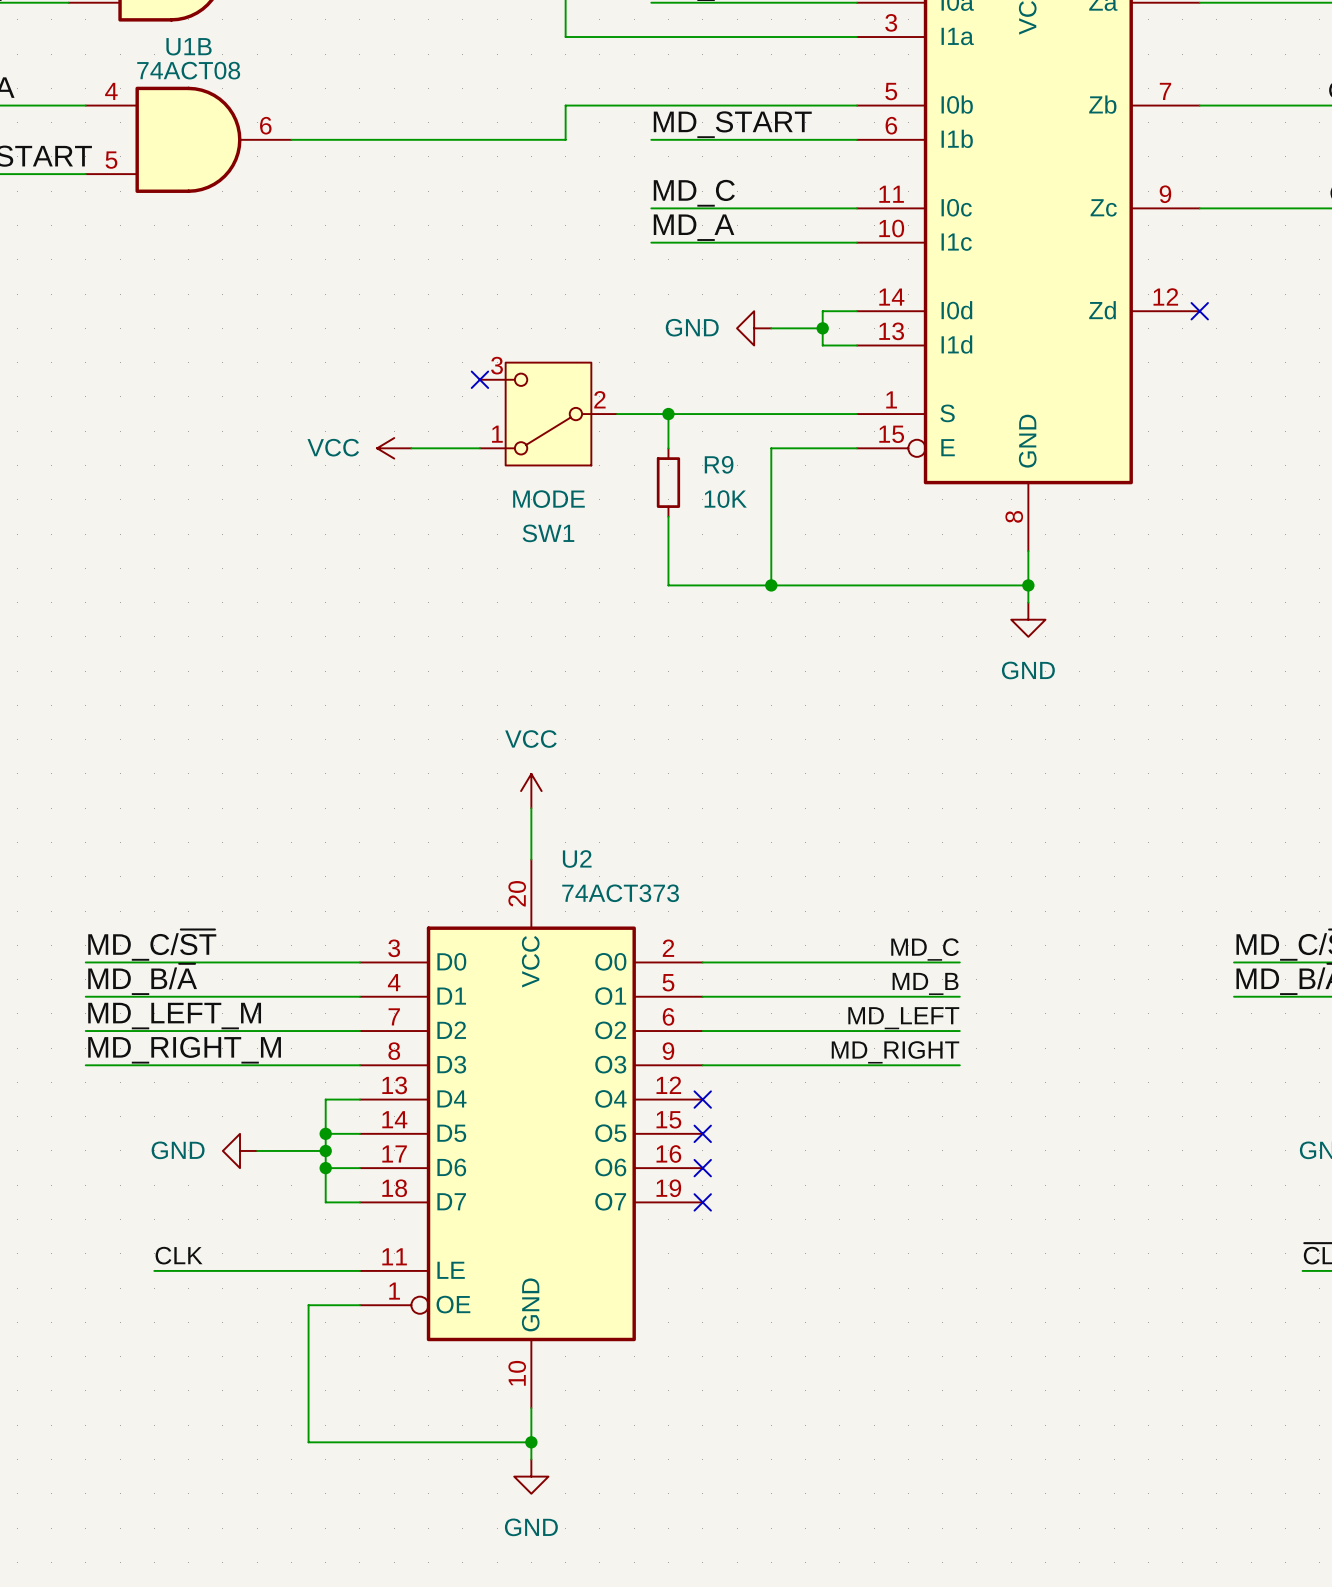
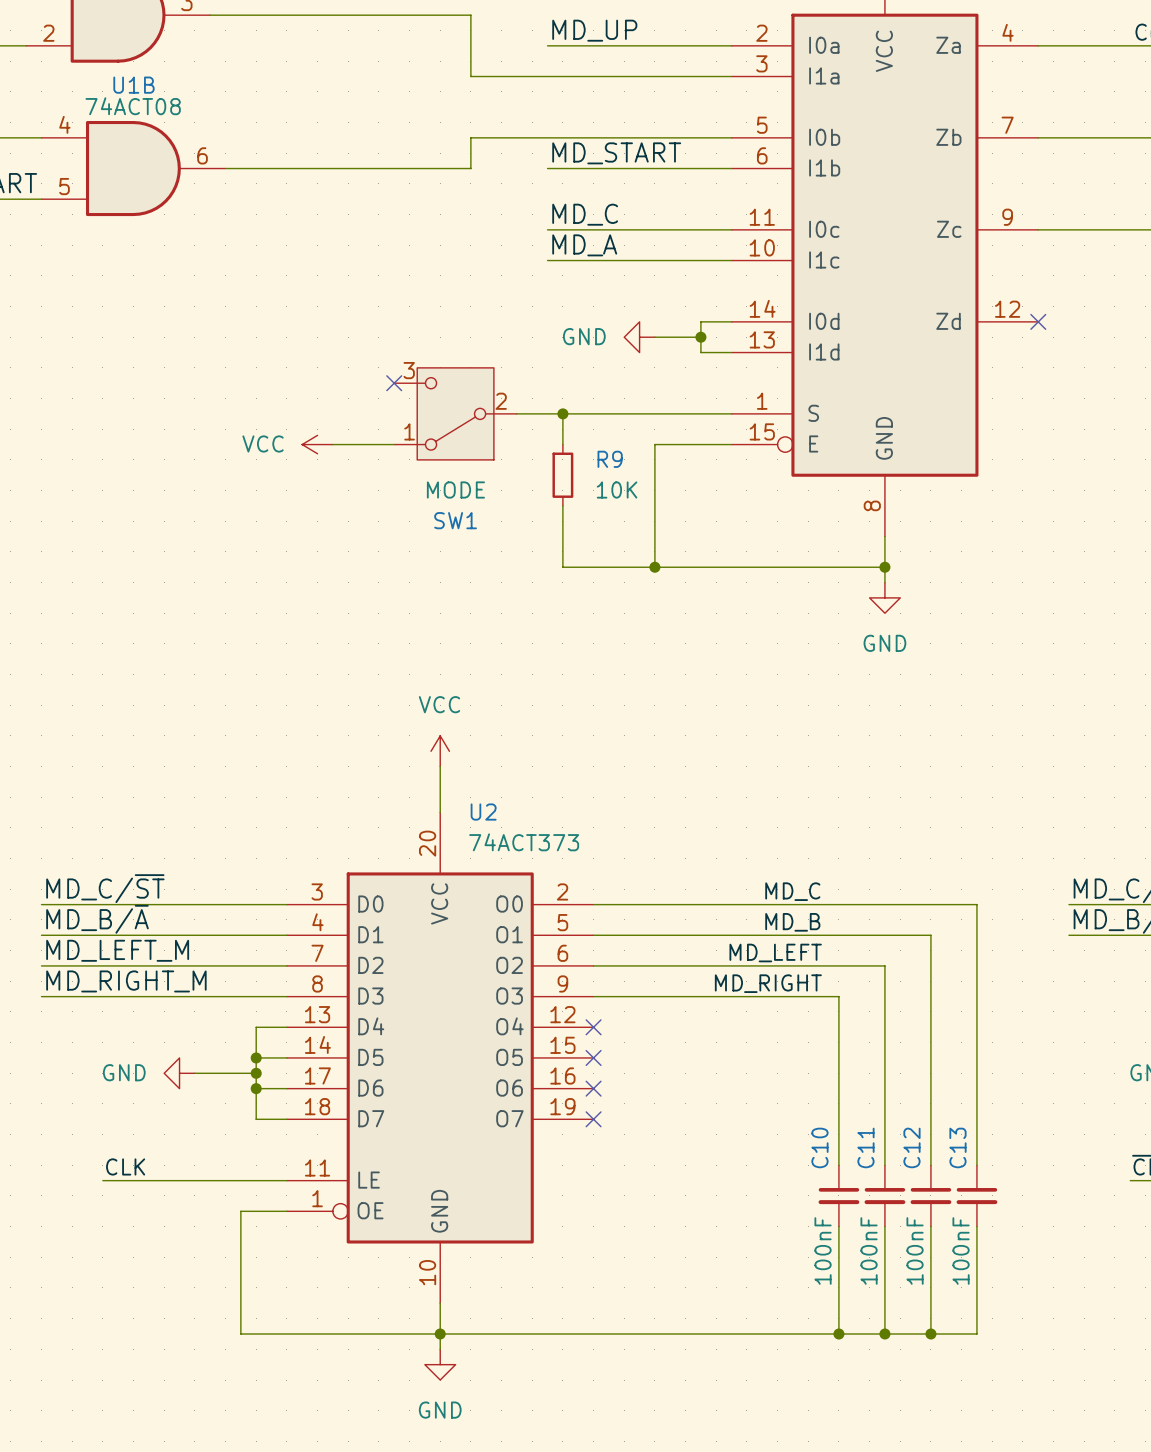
wire: none -> (823, 904) (976, 904) (976, 1165)
wire: none -> (823, 935) (930, 935) (930, 1165)
wire: none -> (823, 965) (884, 965) (884, 1165)
wire: none -> (823, 996) (838, 996) (838, 1165)
C10: none -> 100nF (838, 1195)
C11: none -> 100nF (884, 1195)
C12: none -> 100nF (930, 1195)
C13: none -> 100nF (976, 1195)
wire: none -> (838, 1226) (838, 1333)
wire: none -> (884, 1226) (884, 1333)
wire: none -> (930, 1226) (930, 1333)
wire: none -> (976, 1226) (976, 1333) (440, 1333)
junction: none -> (838, 1333)
junction: none -> (884, 1333)
junction: none -> (930, 1333)

